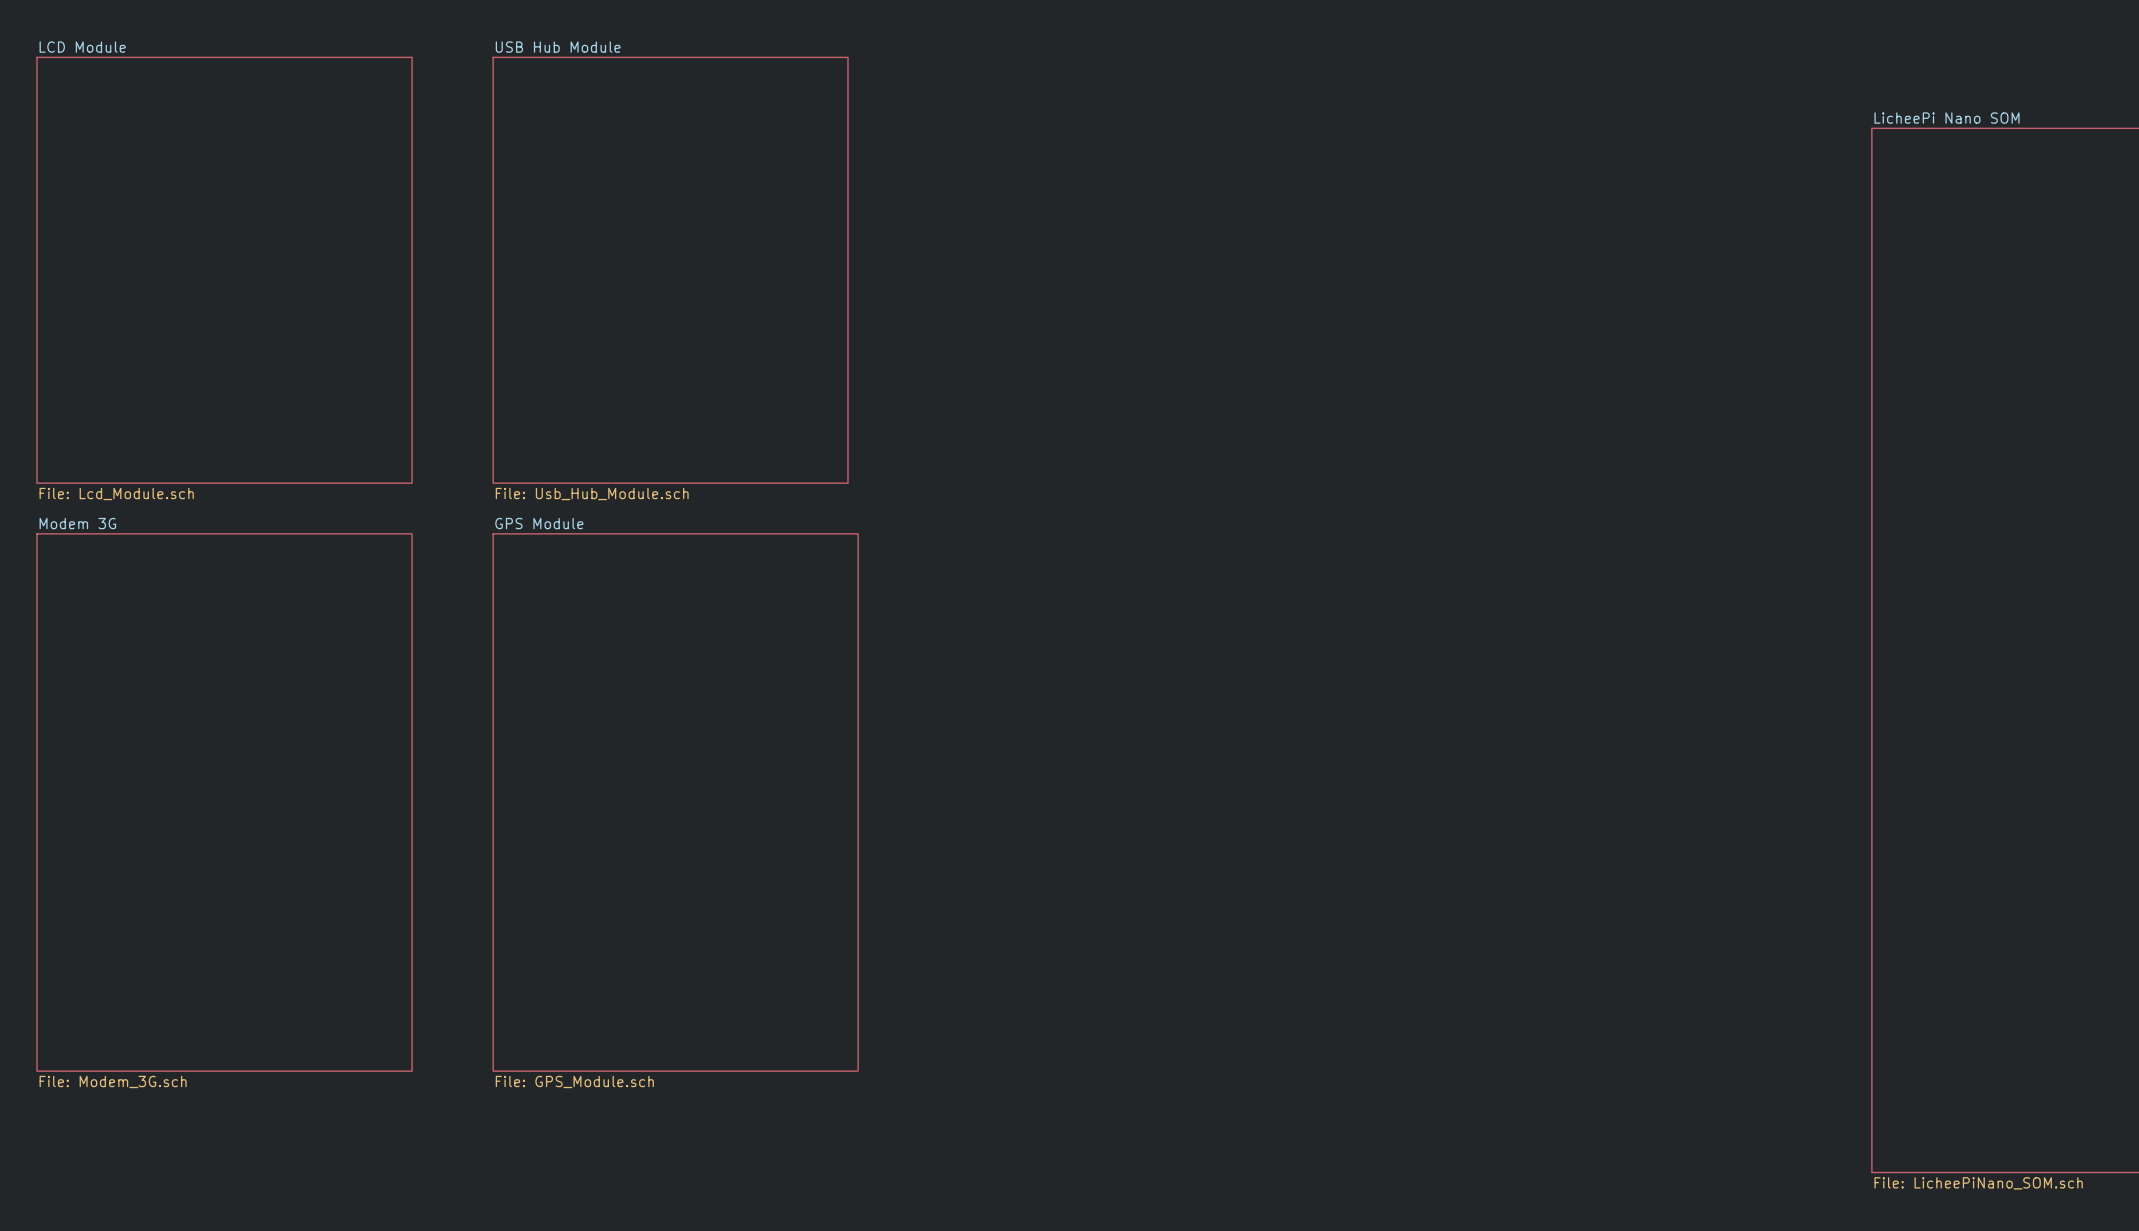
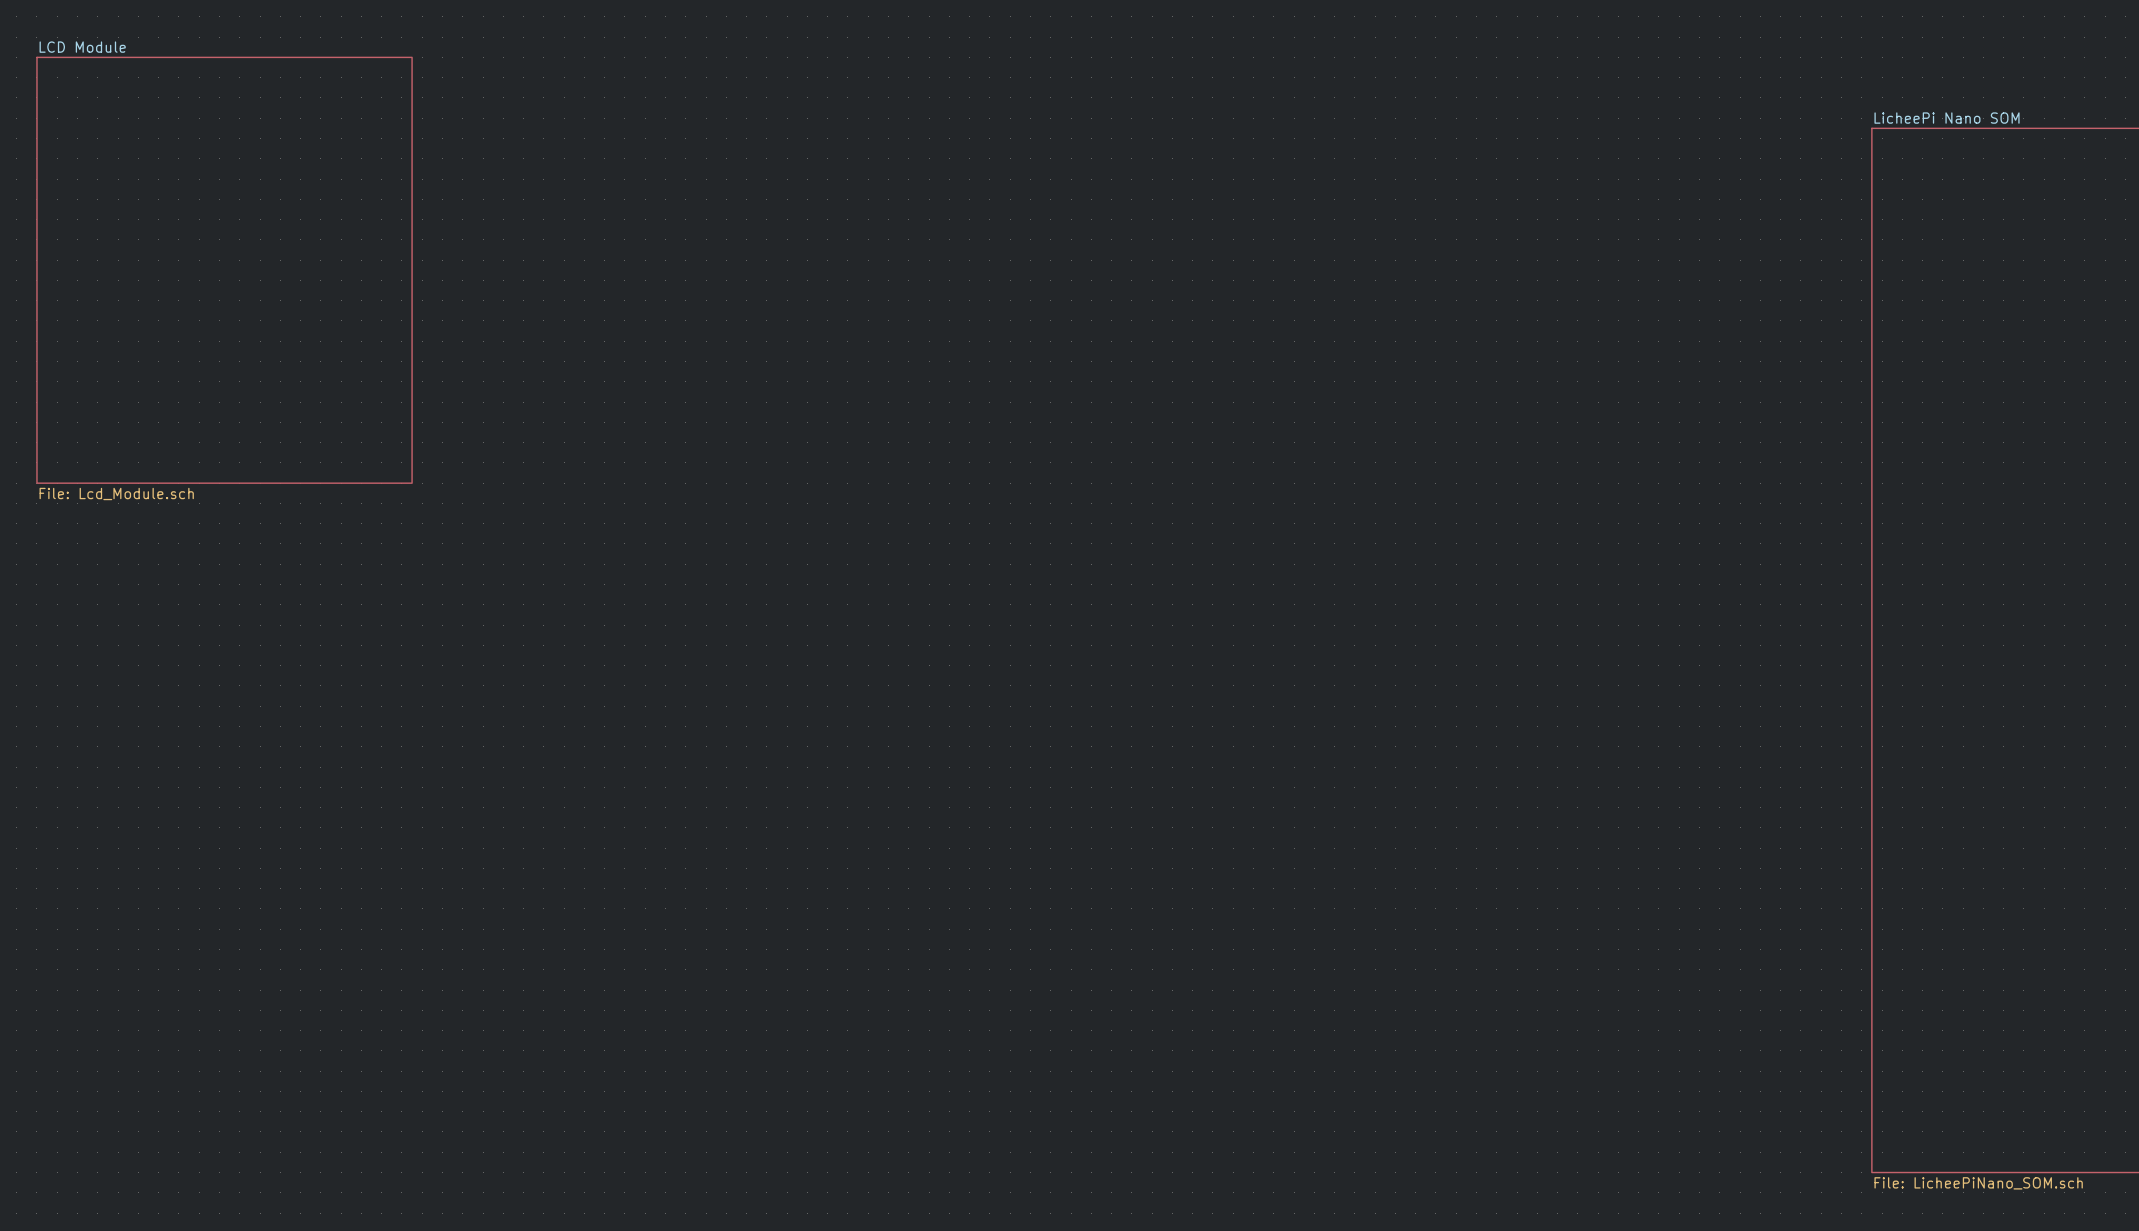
sheet USB Hub Module: File: Usb_Hub_Module.sch (670, 270) -> none
sheet Modem 3G: File: Modem_3G.sch (224, 802) -> none
sheet GPS Module: File: GPS_Module.sch (675, 802) -> none

